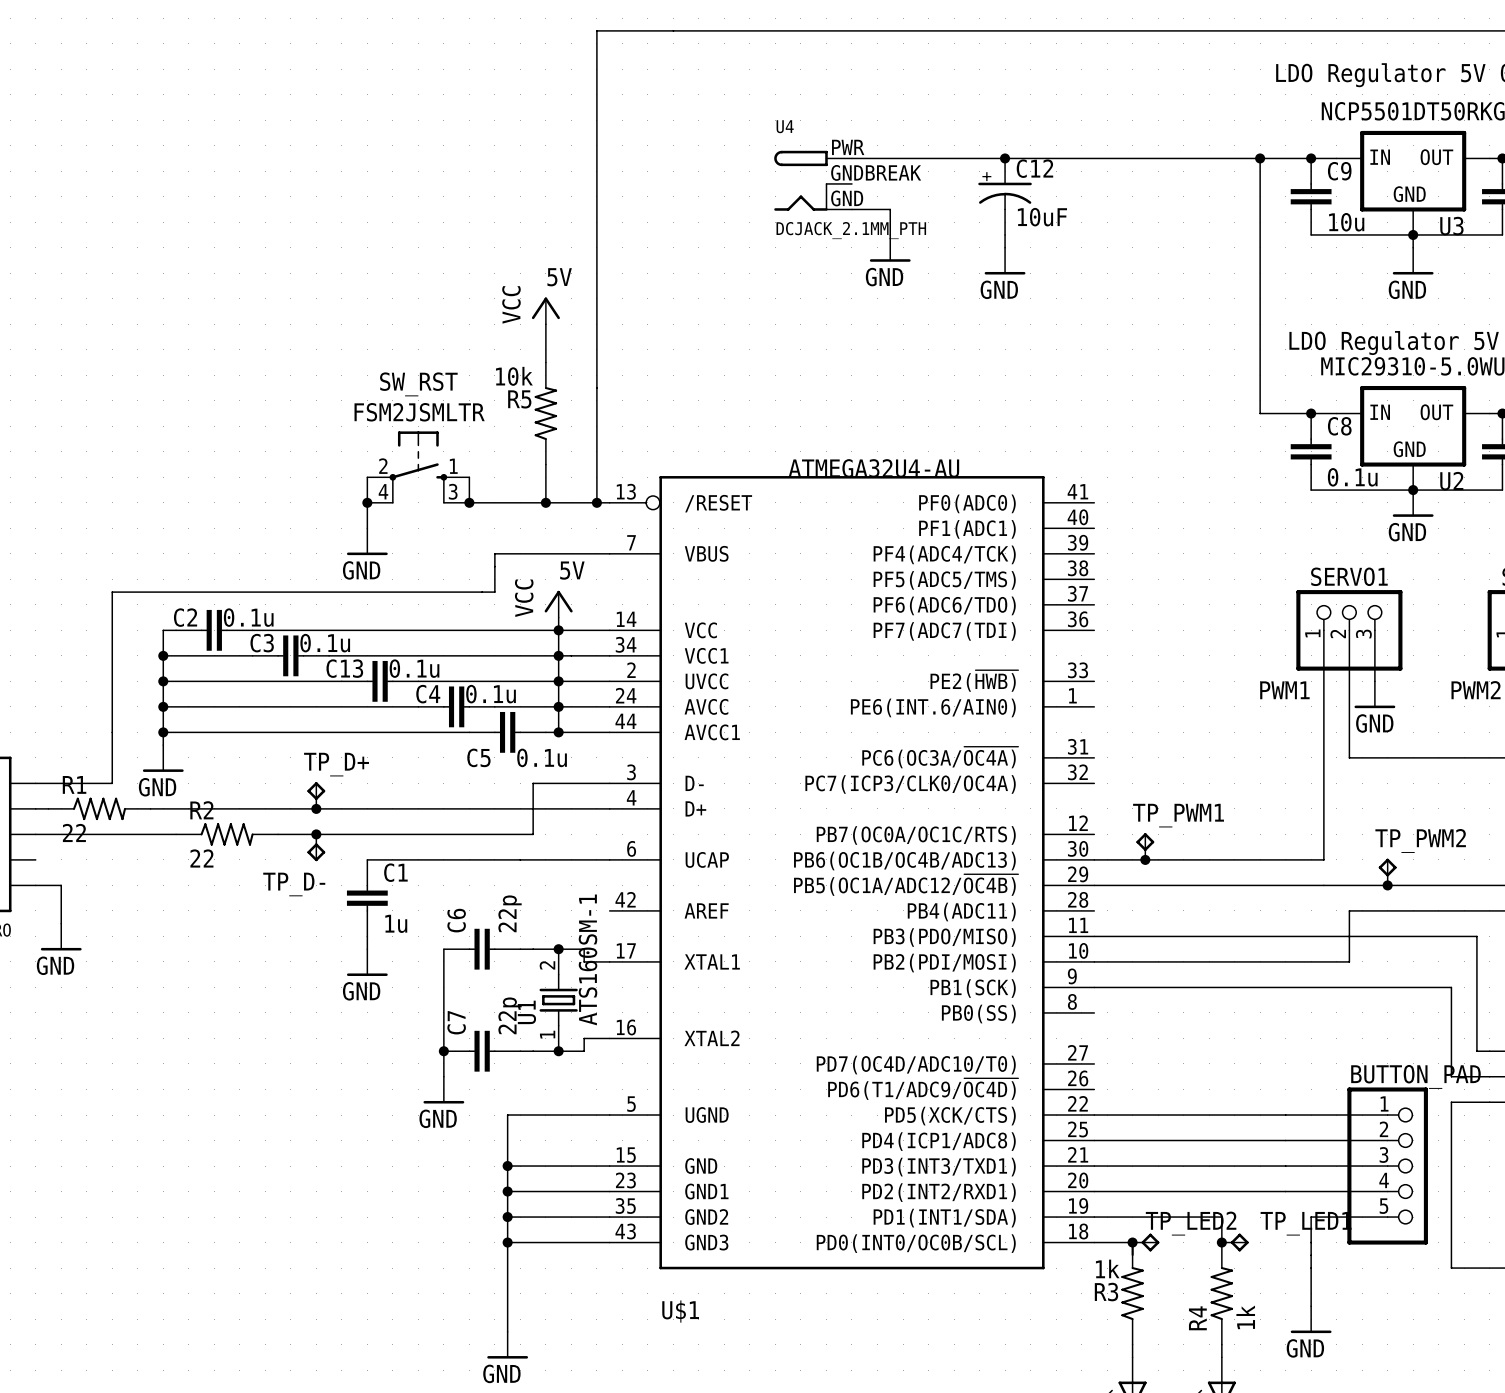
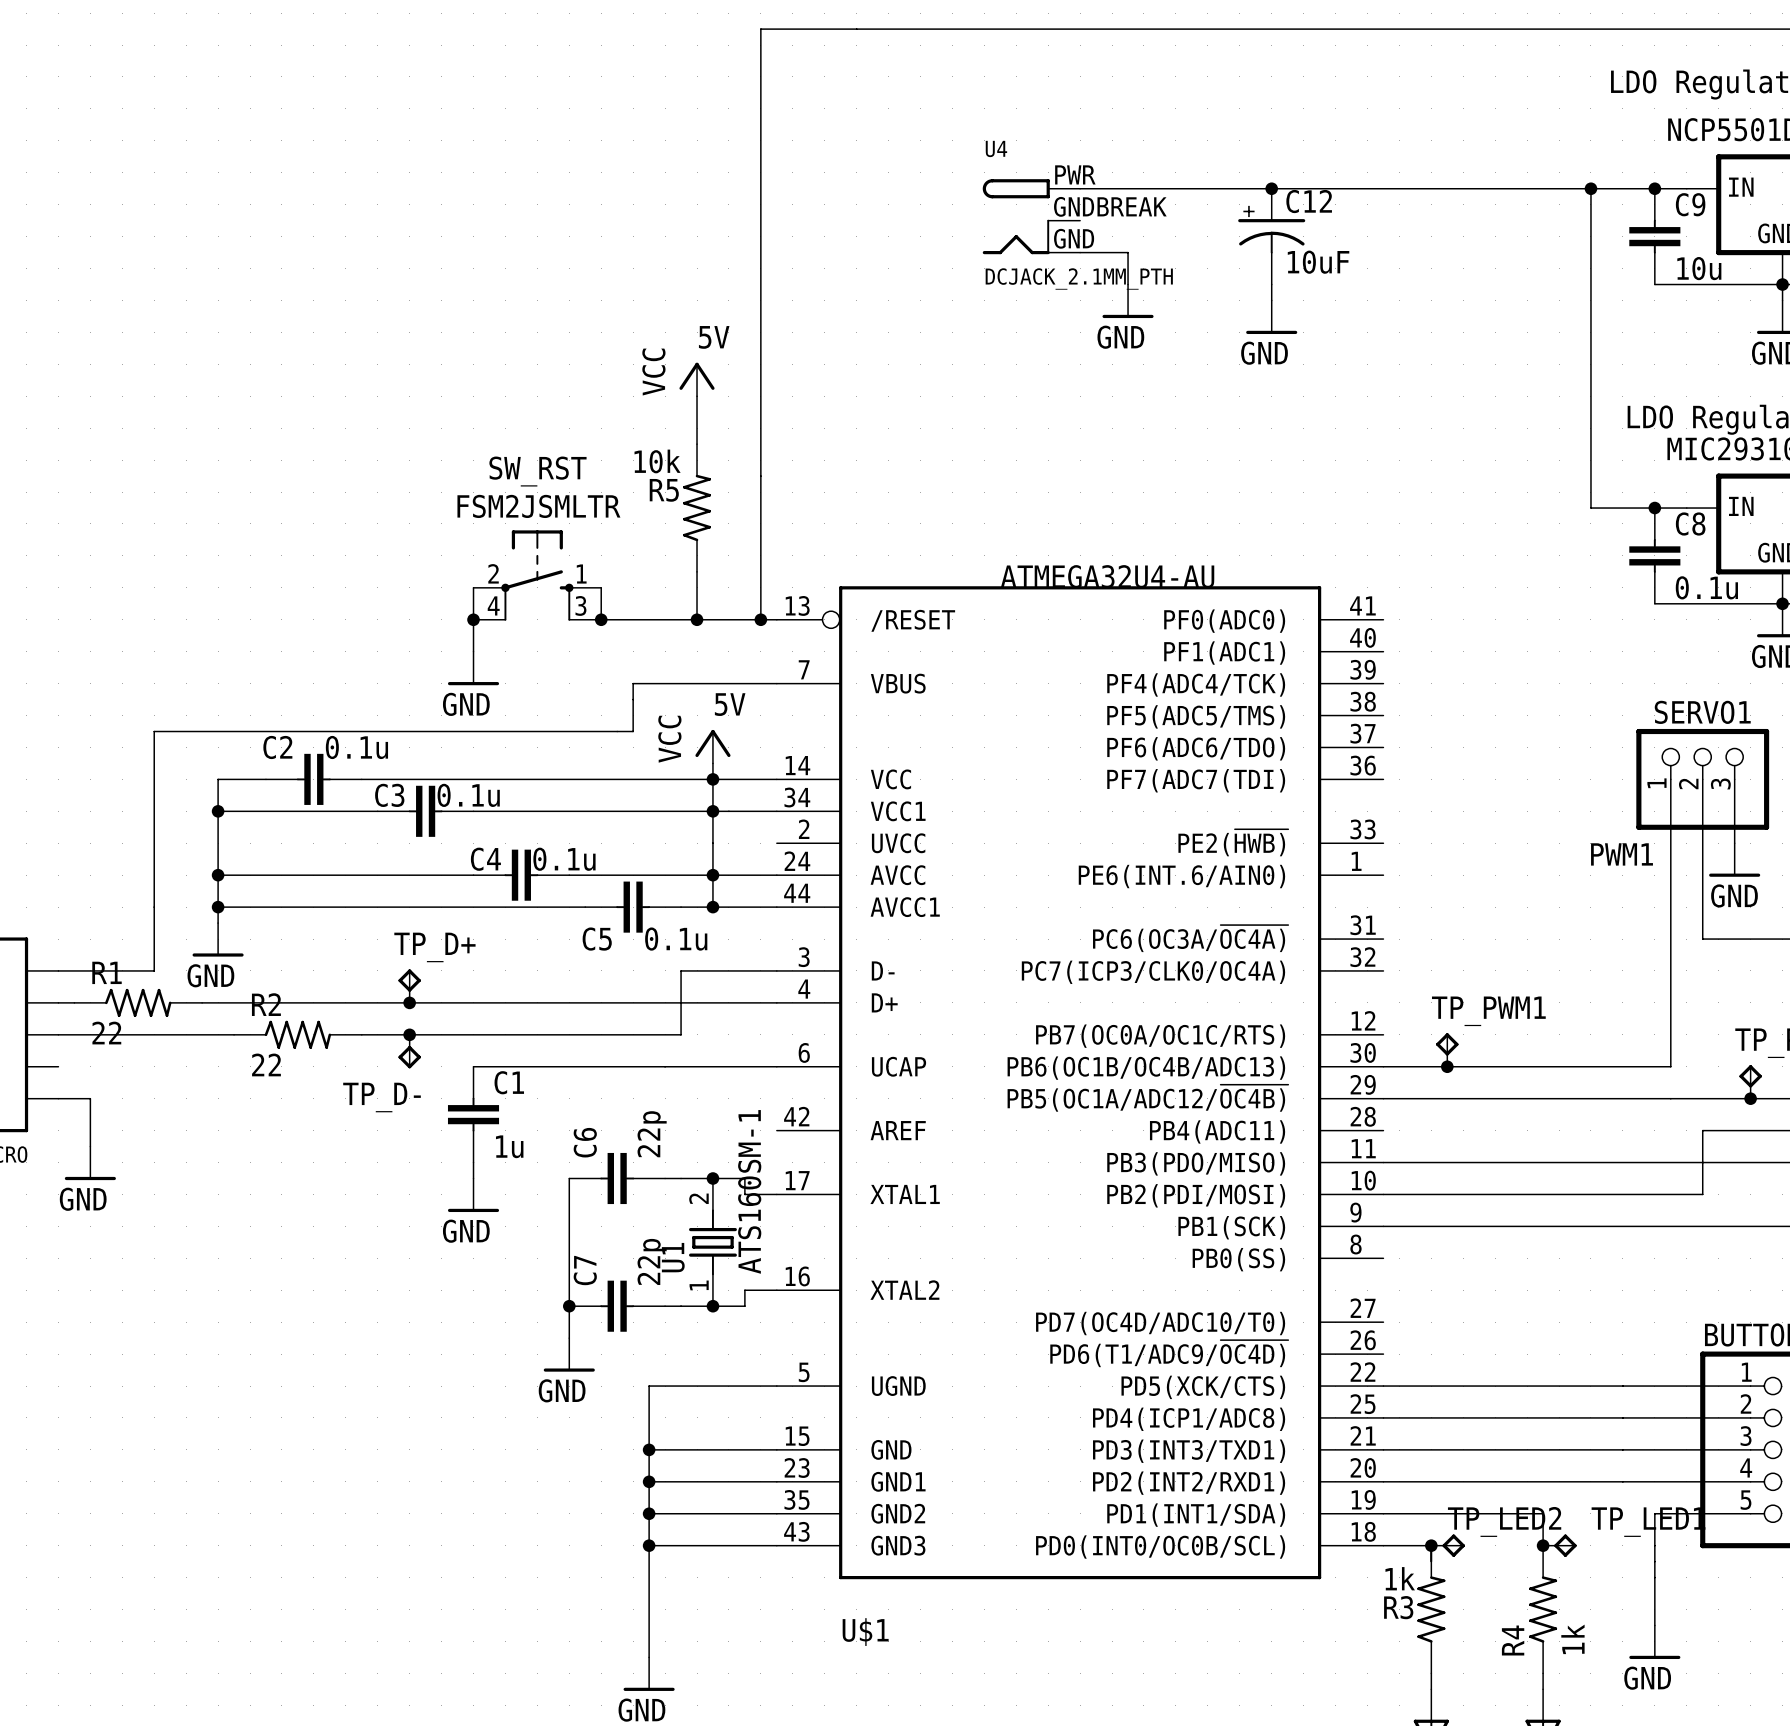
C2 name position: C2 (185, 617) -> C2 (277, 747)
C2 value position: 0.1u (248, 617) -> 0.1u (356, 747)
C2 position: (214, 630) -> (313, 779)
C3 position: (290, 655) -> (425, 811)
wire: (163, 681) (341, 681) -> none
junction: (163, 681) -> none
C13: 0.1u (380, 681) -> none
wire: (418, 681) (609, 681) -> none
junction: (558, 681) -> none
C4 position: (456, 706) -> (521, 875)
C5 position: (507, 732) -> (633, 907)

